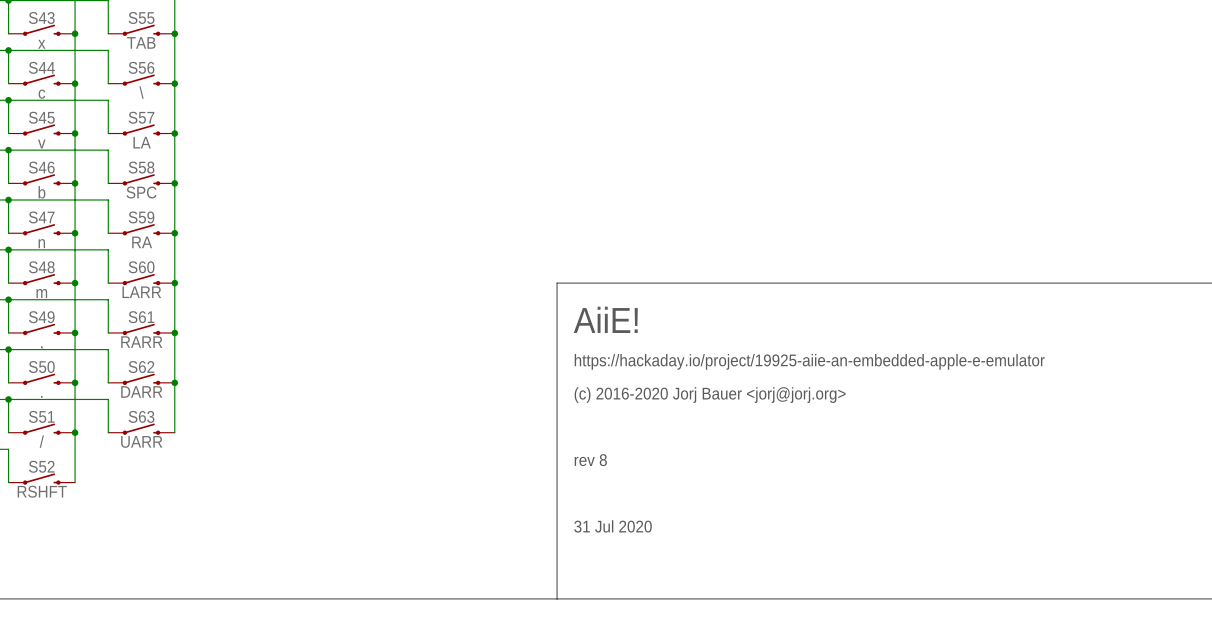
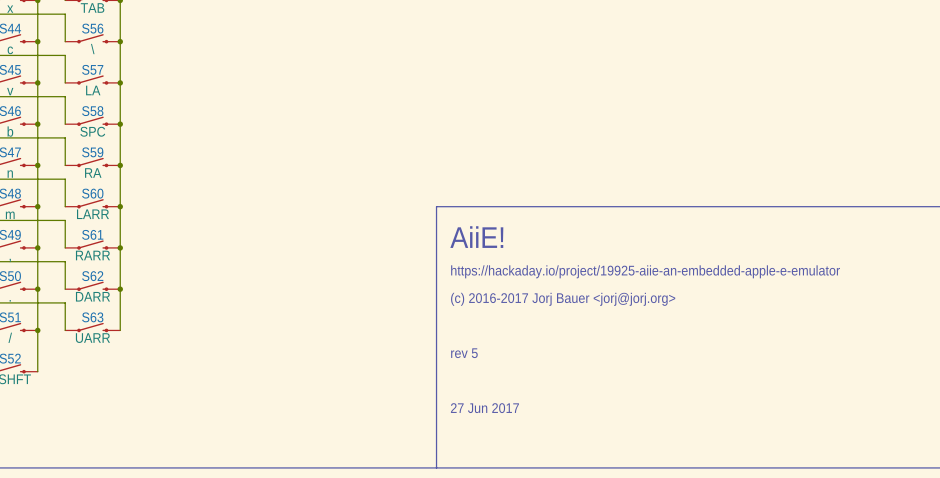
text: (c) 2016-2020 Jorj Bauer <jorj@jorj.org> (710, 395) -> (c) 2016-2017 Jorj Bauer <jorj@jorj.org> (563, 299)
text: rev 8 (590, 460) -> rev 5 (464, 353)
text: 31 Jul 2020 (613, 526) -> 27 Jun 2017 (484, 408)

